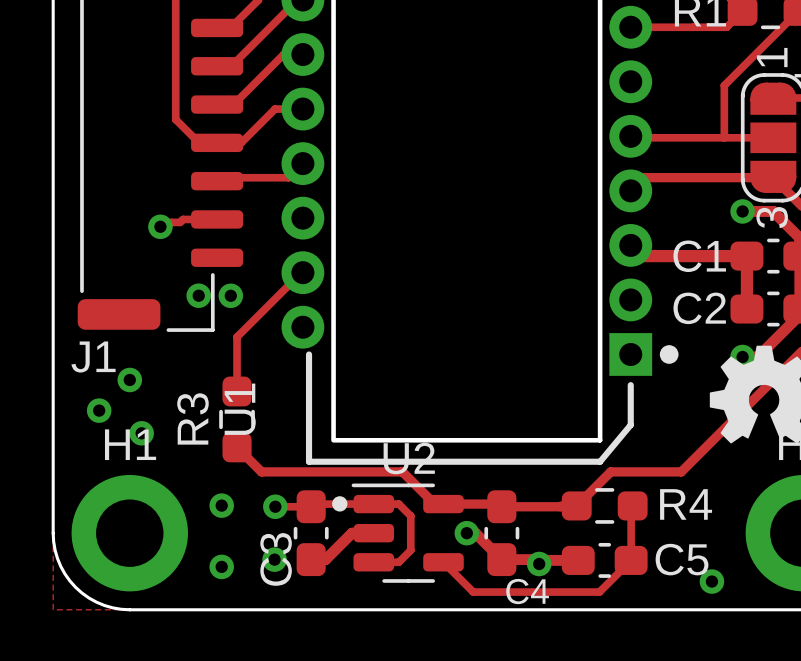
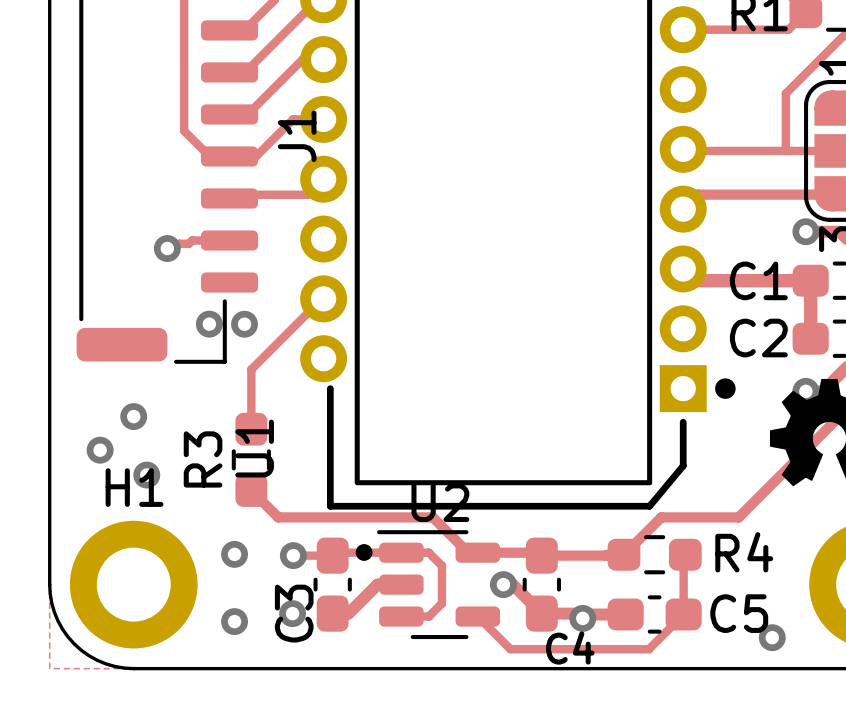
J1 name rotation: 0° (93, 357) -> 90° counterclockwise (297, 136)
J1 name position: J1 (93, 357) -> J1 (297, 136)

